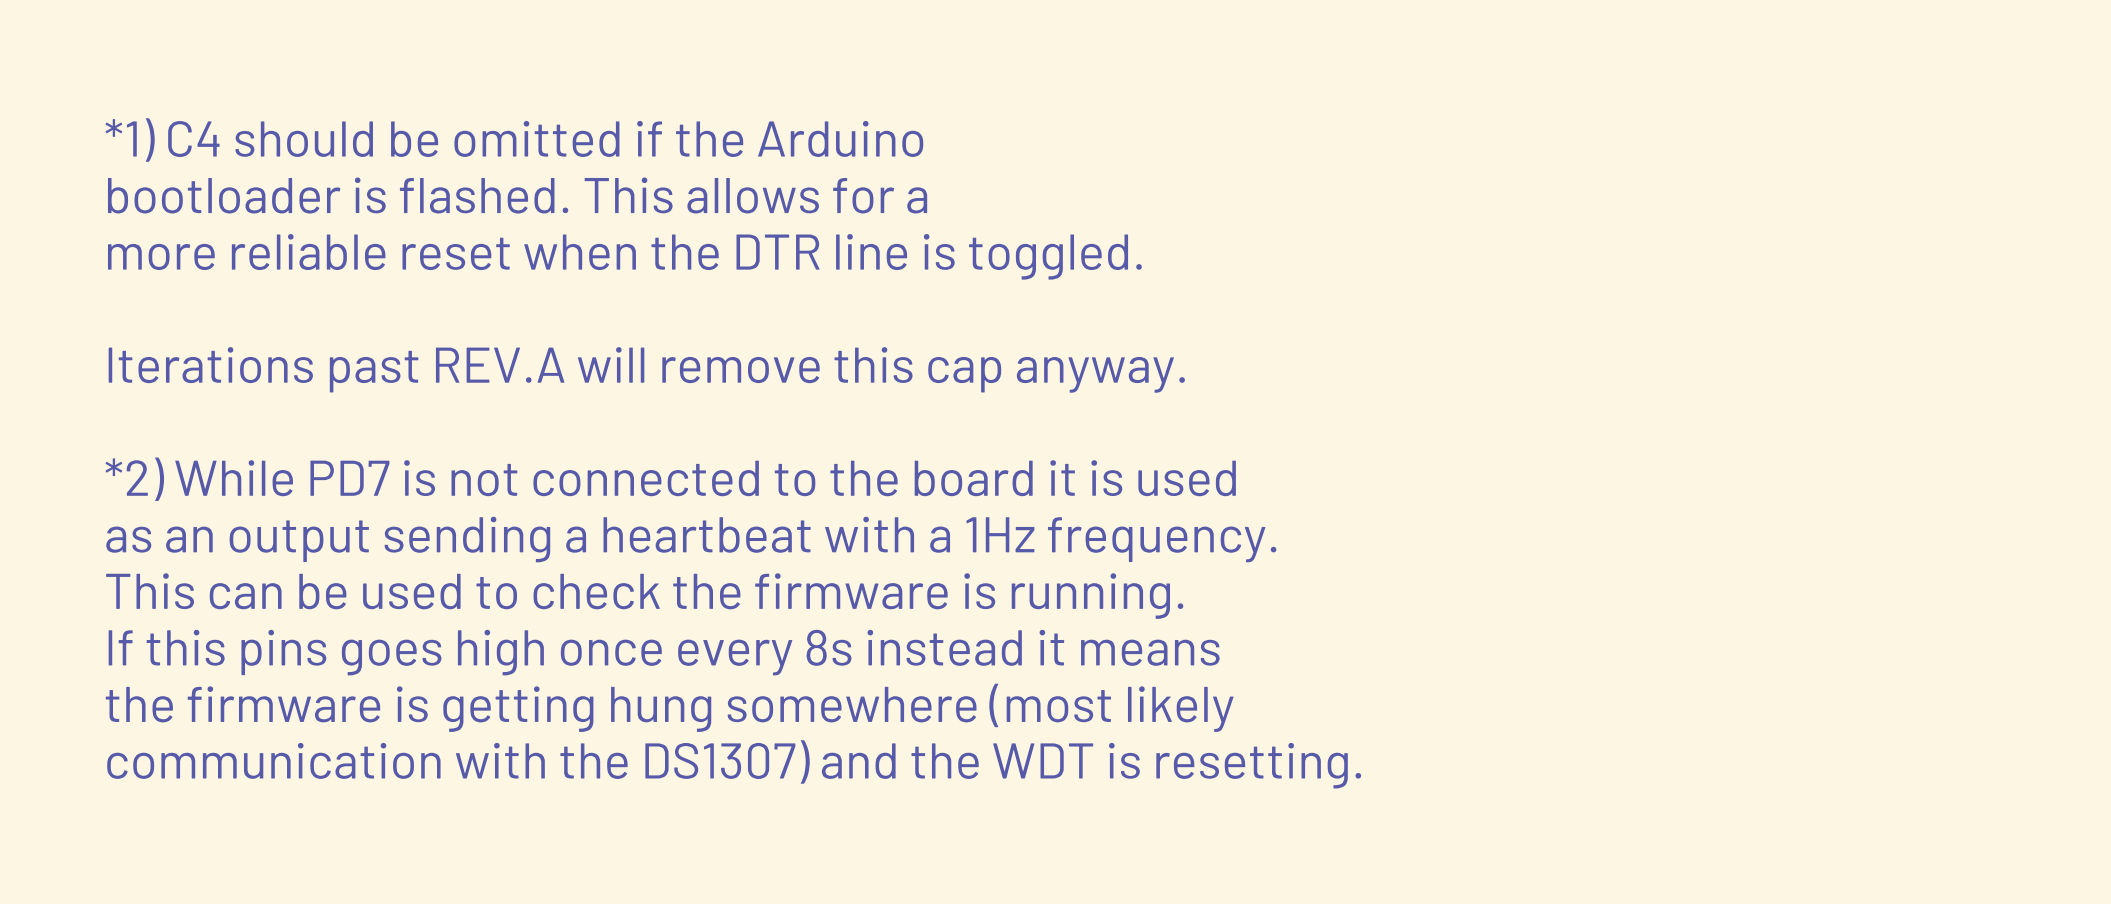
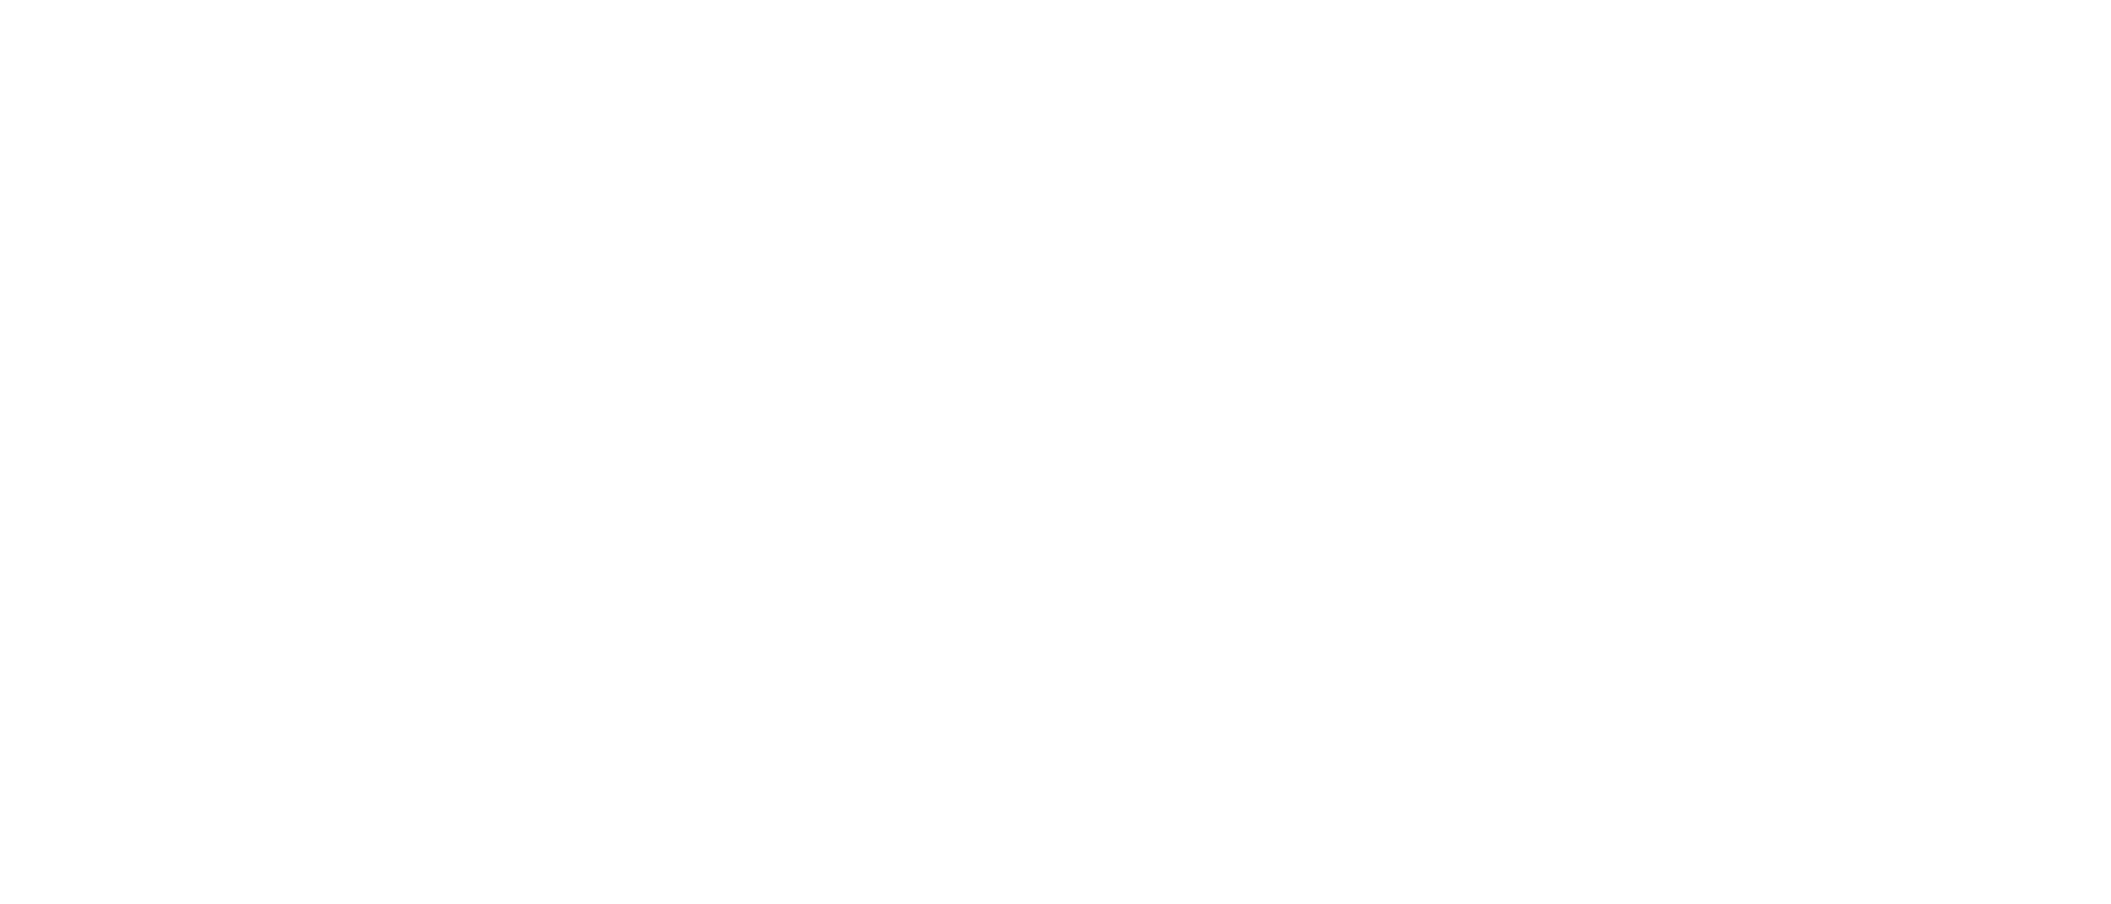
text: *1) C4 should be omitted if the Arduino (514, 140) -> none
text: bootloader is flashed. This allows for a (517, 195) -> none
text: more reliable reset when the DTR line is toggled. (624, 256) -> none
text: Iterations past REV.A will remove this cap anyway. (646, 369) -> none
text: *2) While PD7 is not connected to the board it is used (670, 479) -> none
text: as an output sending a heartbeat with a 1Hz frequency. (691, 539) -> none
text: This can be used to check the firmware is running. (644, 596) -> none
text: If this pins goes high once every 8s instead it means (664, 652) -> none
text: the firmware is getting hung somewhere (most likely (669, 707) -> none
text: communication with the DS1307) and the WDT is resetting. (734, 764) -> none

